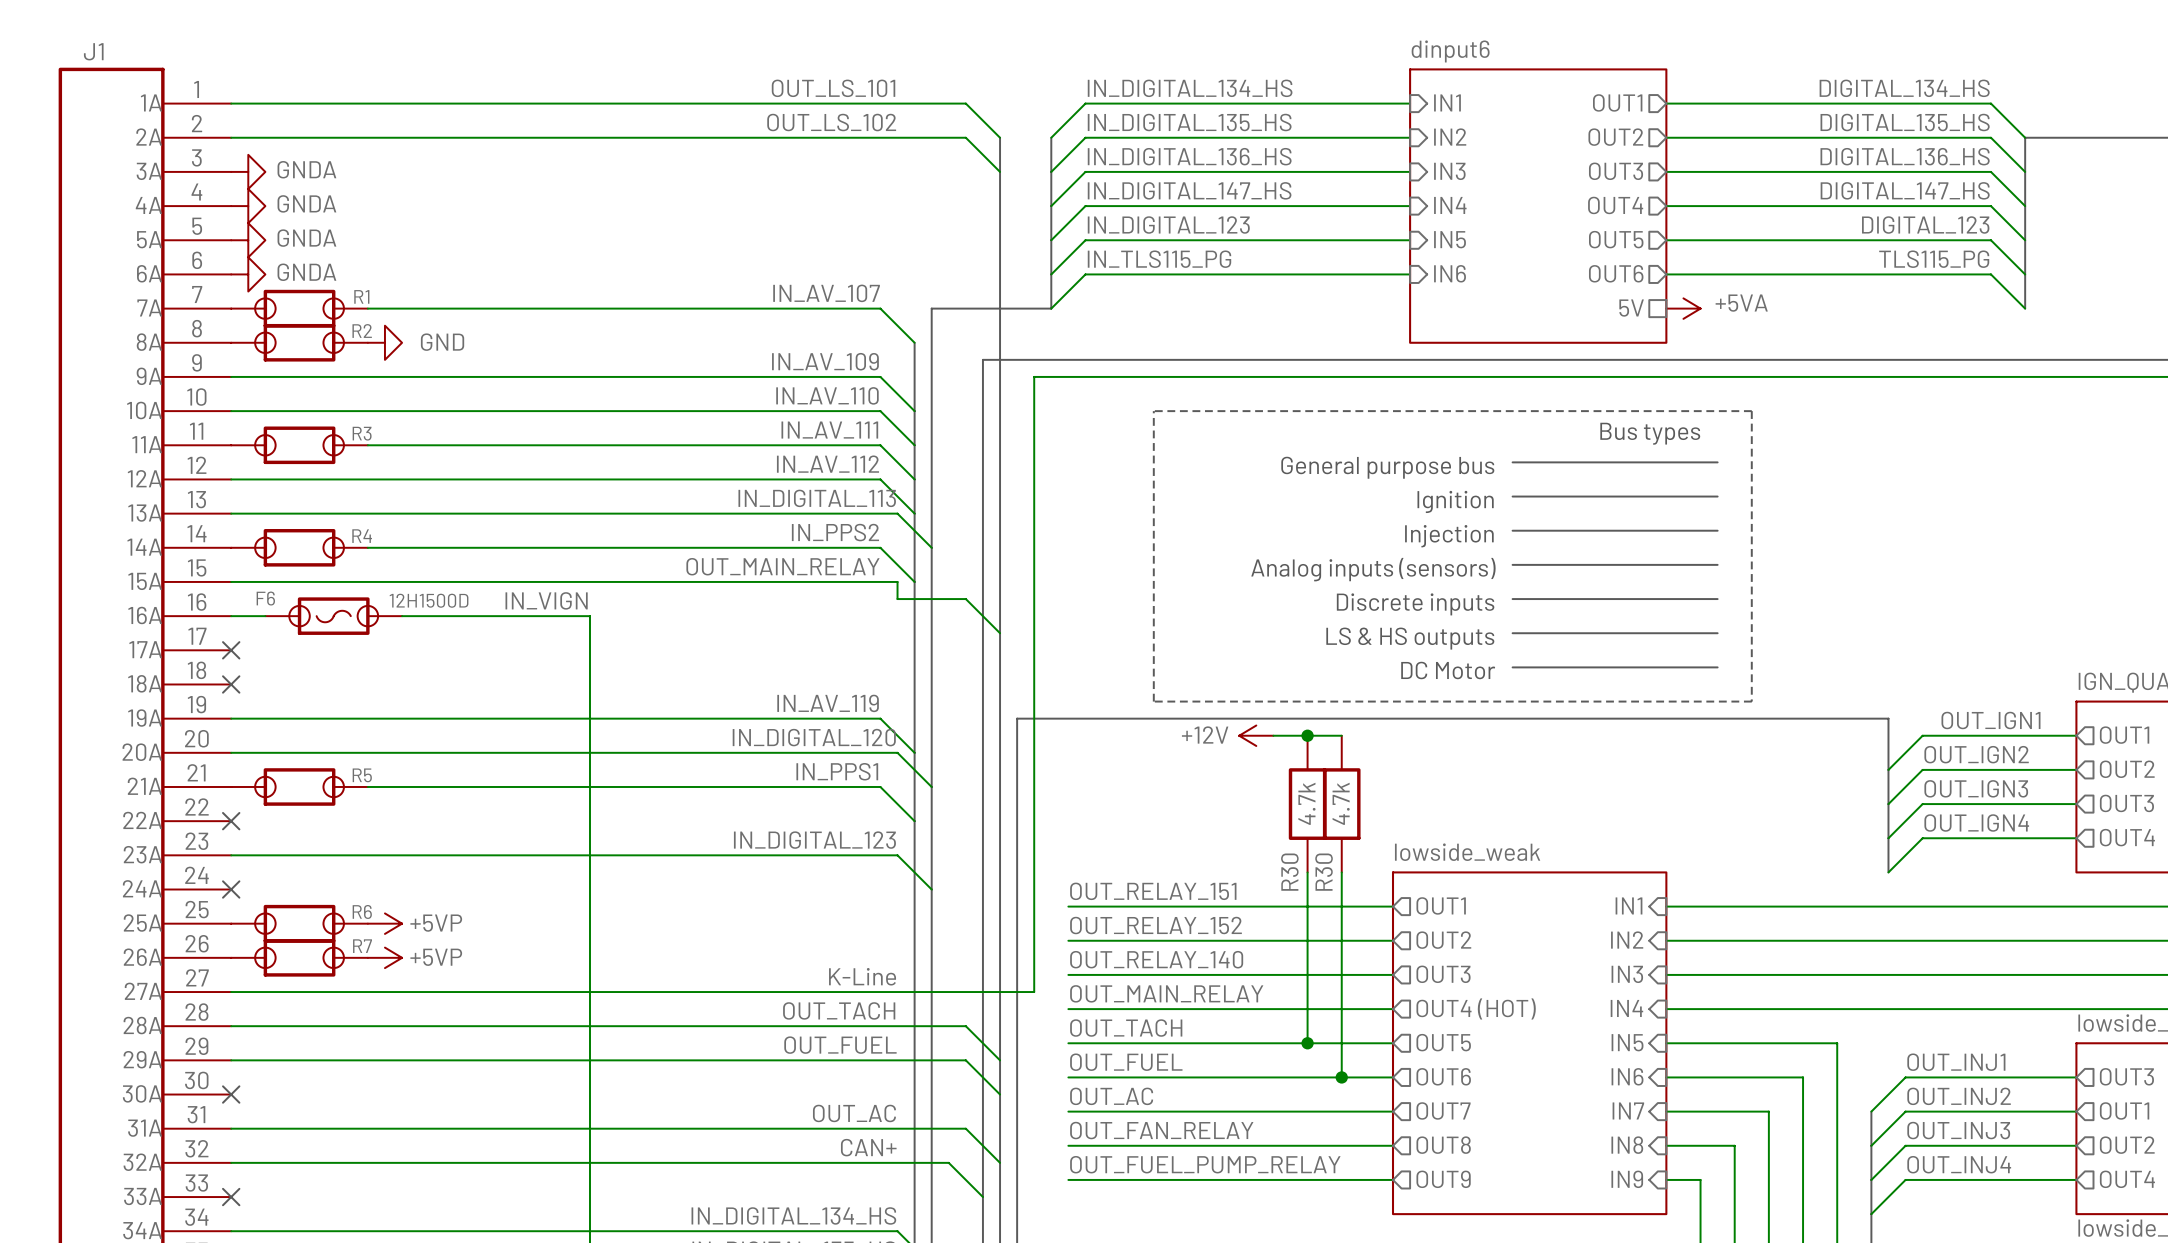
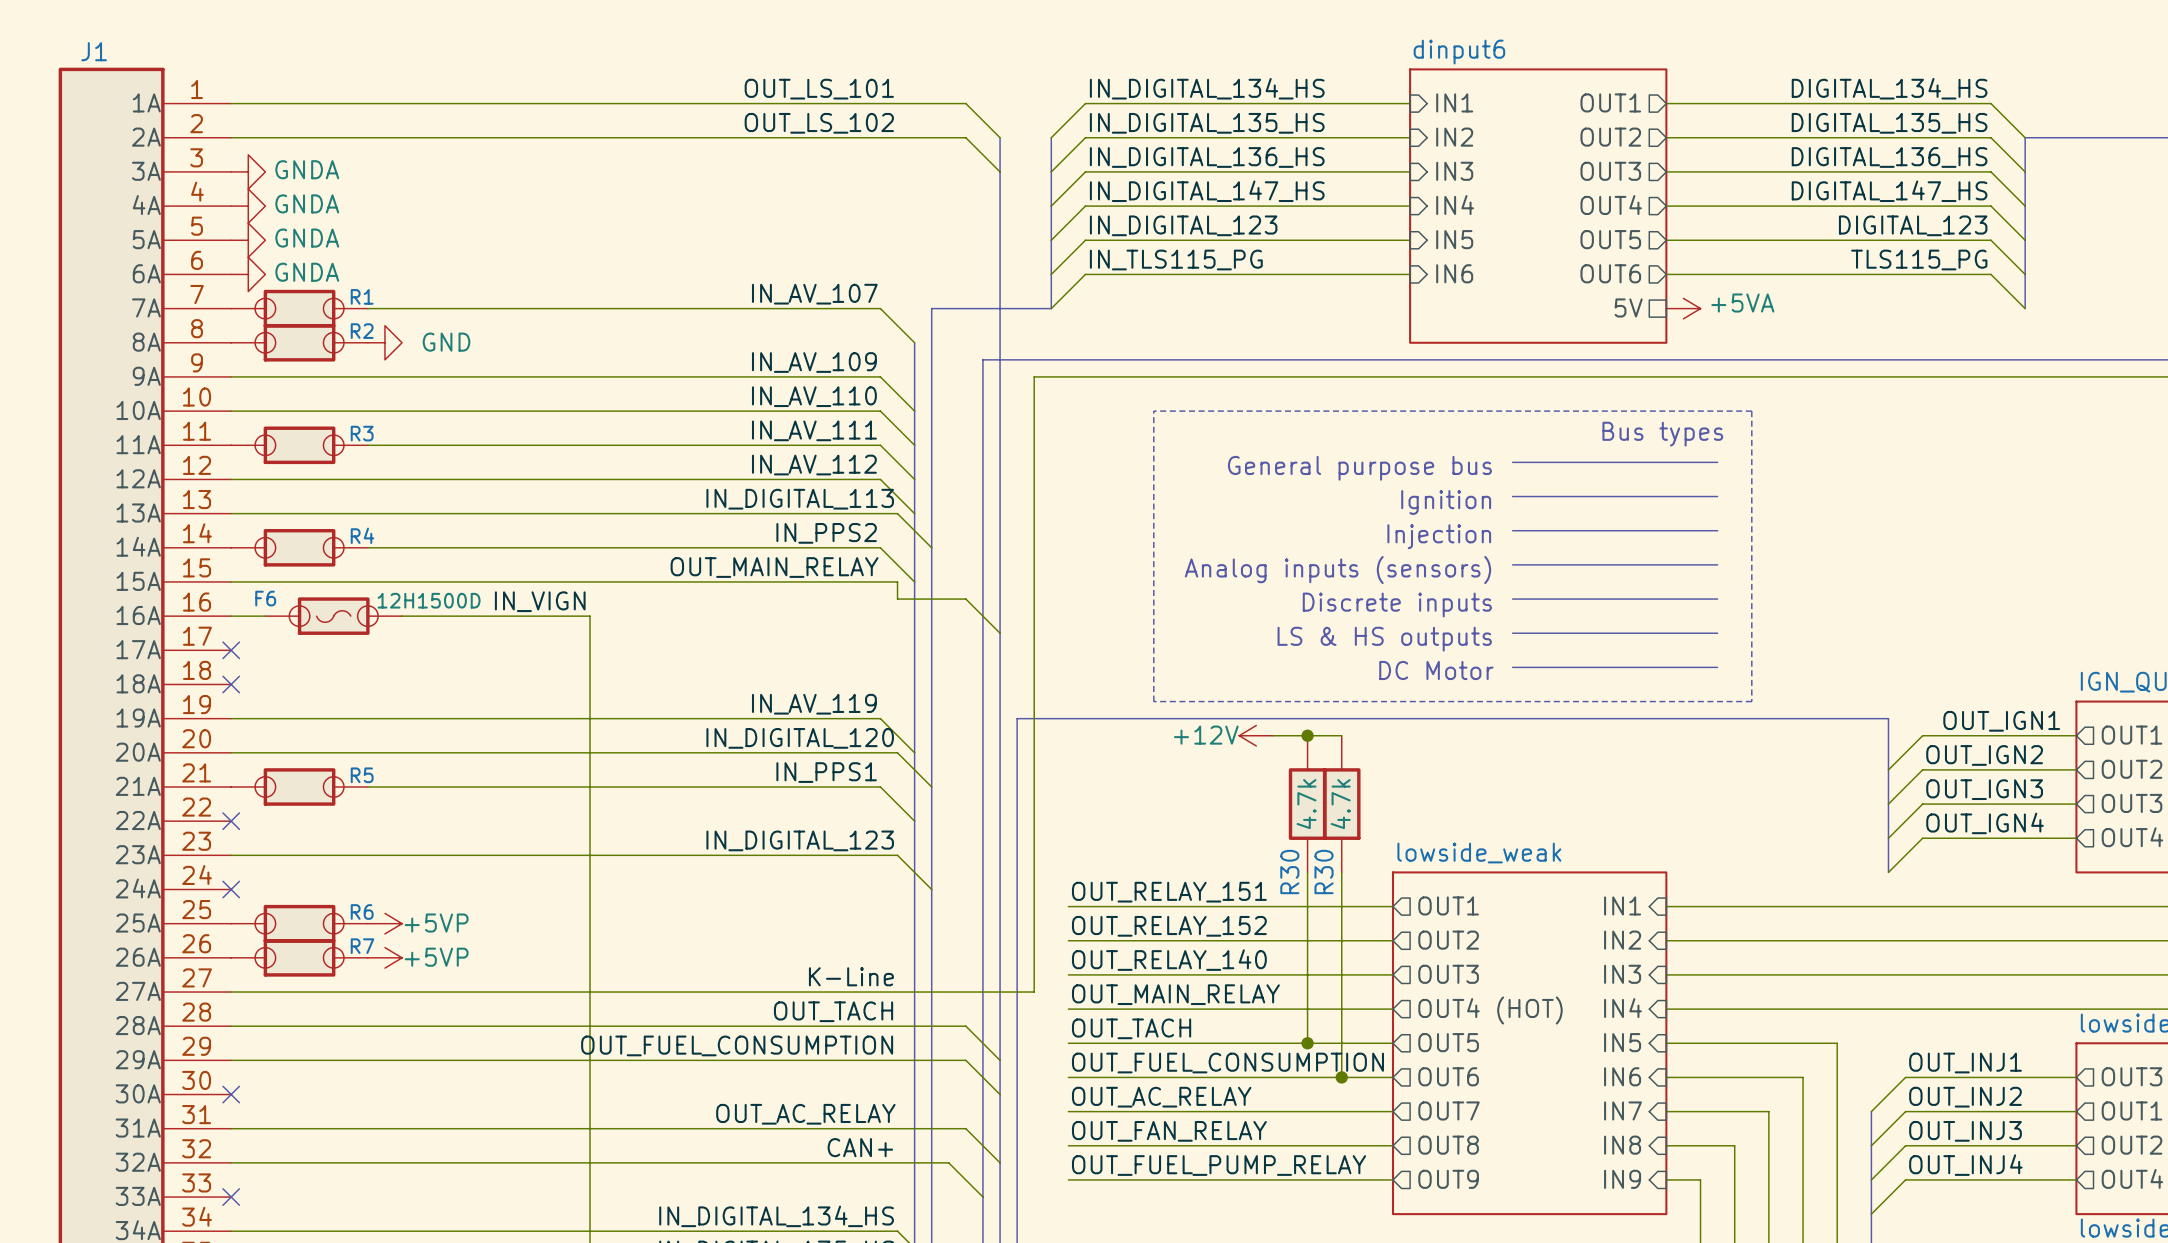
label: OUT_FUEL (840, 1045) -> OUT_FUEL_CONSUMPTION (737, 1045)
label: OUT_FUEL (1126, 1062) -> OUT_FUEL_CONSUMPTION (1227, 1063)
label: OUT_AC (1111, 1096) -> OUT_AC_RELAY (1161, 1097)
label: OUT_AC (854, 1113) -> OUT_AC_RELAY (805, 1114)

